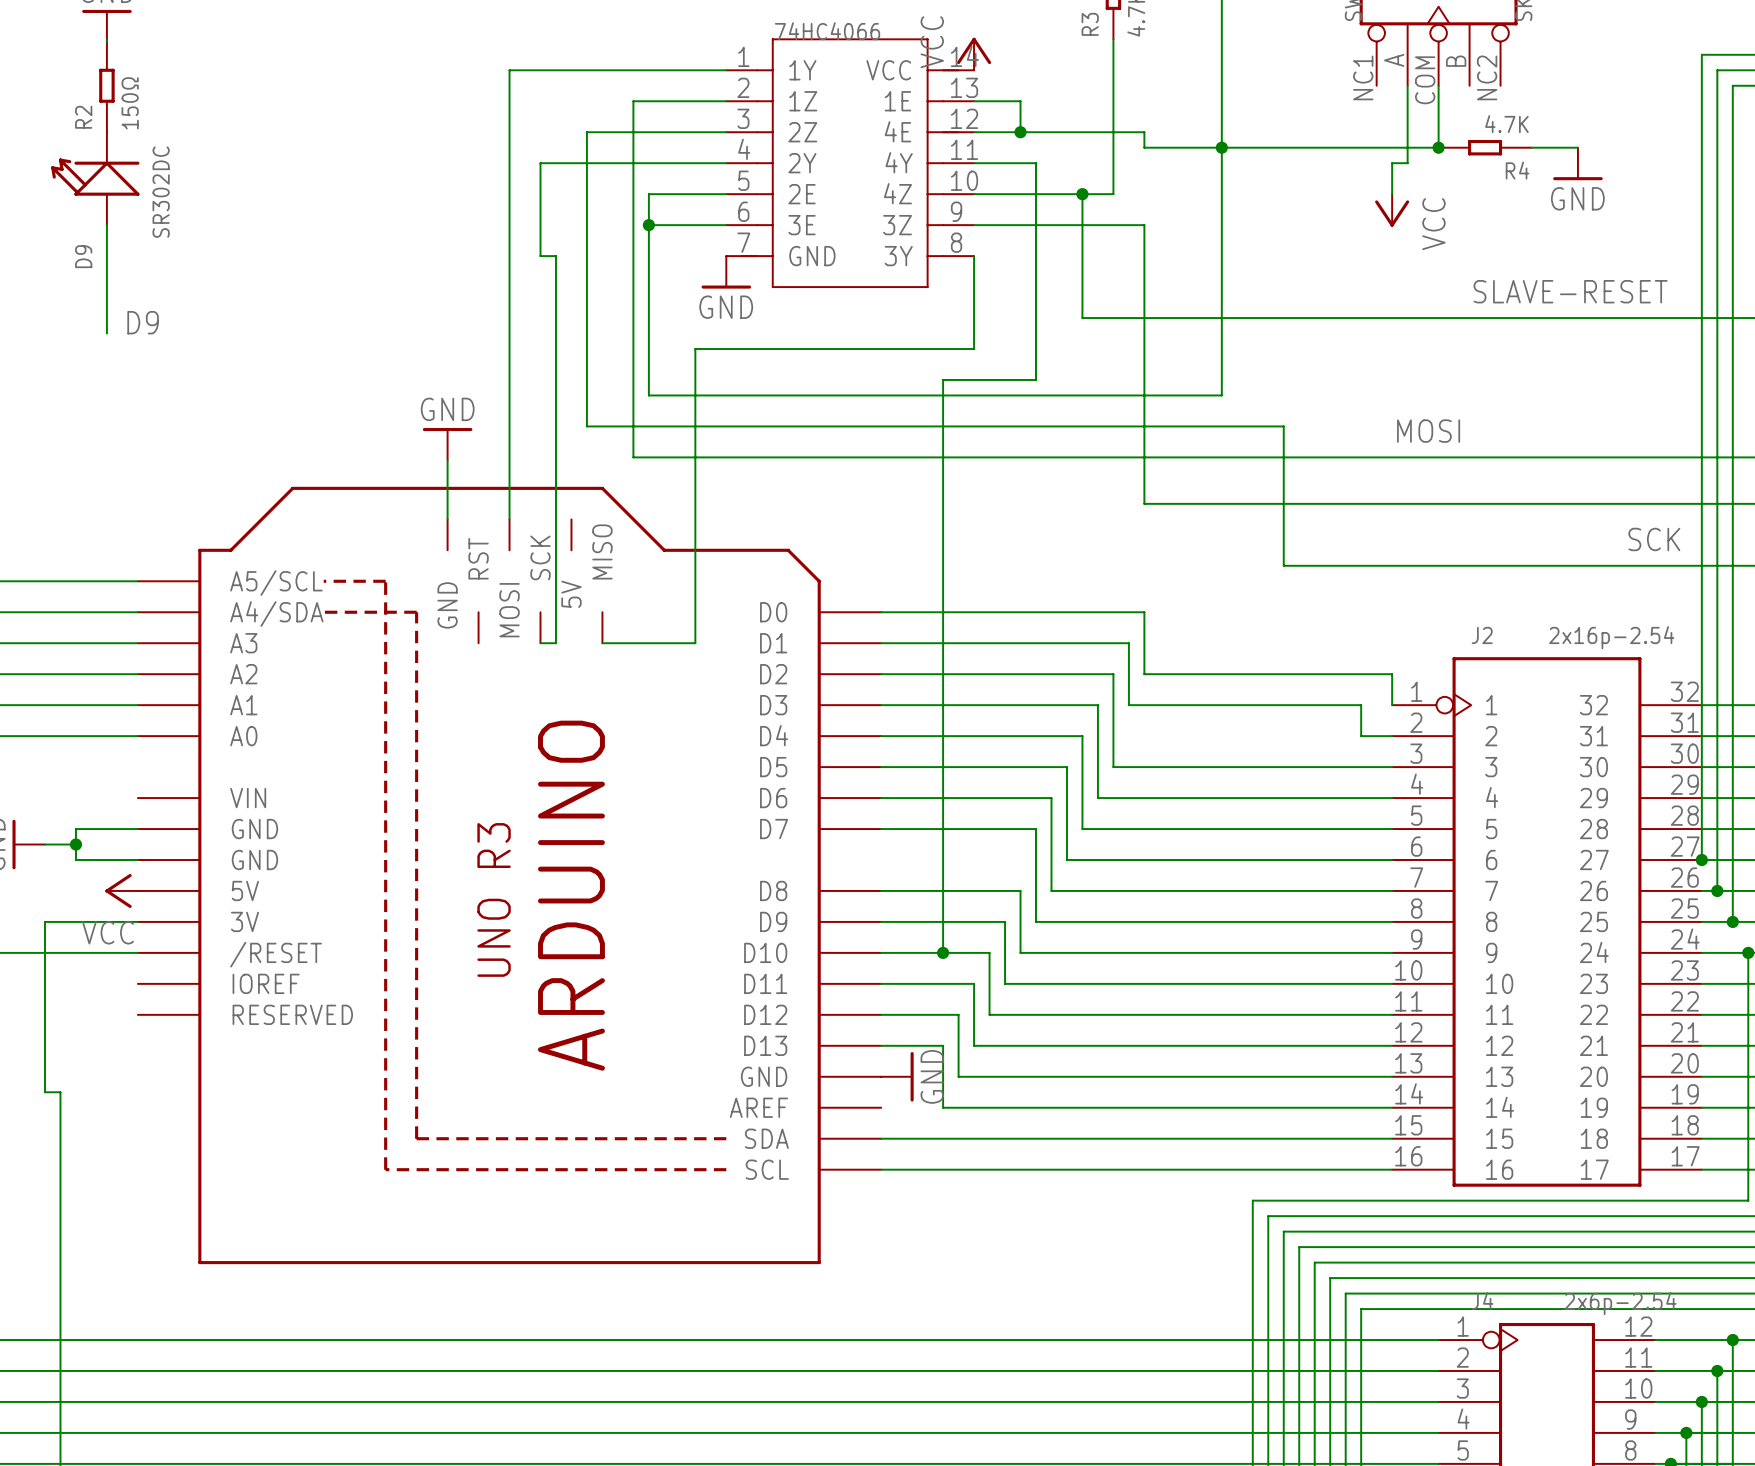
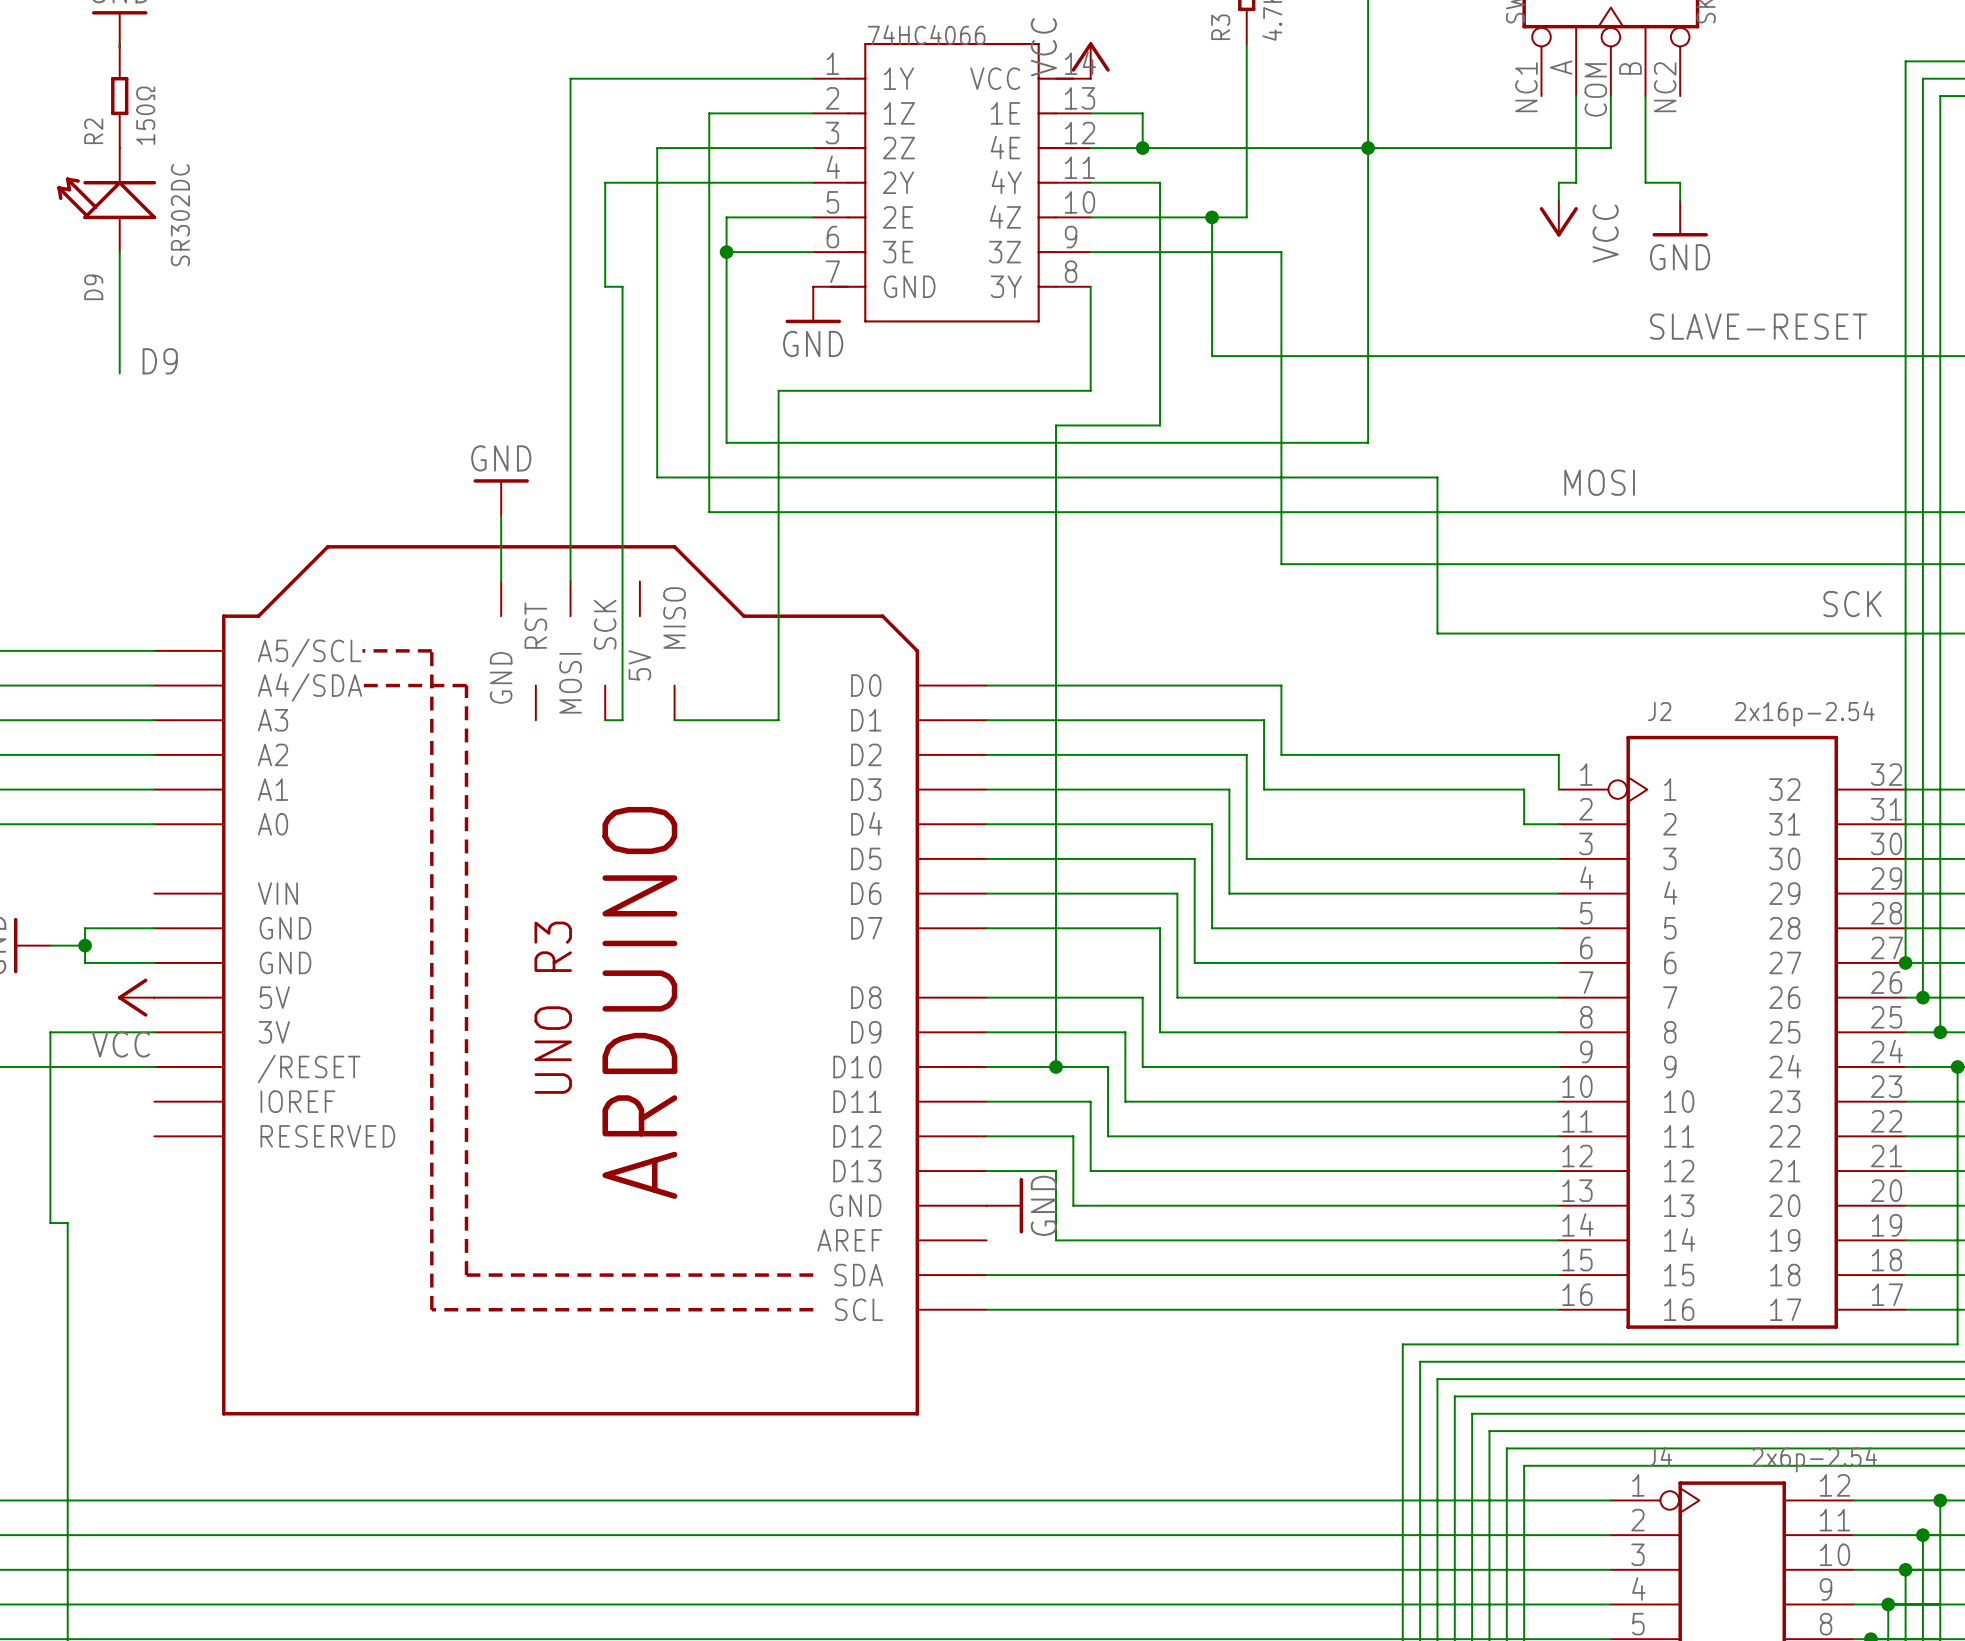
wire: none -> (1645, 96) (1645, 182) (1680, 182) (1680, 200)
wire: (1144, 132) (1144, 147) (1438, 147) (1438, 132) -> (1281, 148) (1610, 148)
junction position: (1221, 147) -> (1368, 148)
junction: (1438, 147) -> none
R4: 4.7K (1485, 147) -> none
wire: (1531, 147) (1577, 147) -> none
power symbol position: GND (1577, 163) -> GND (1680, 218)
power symbol position: VCC (1392, 210) -> VCC (1558, 218)

